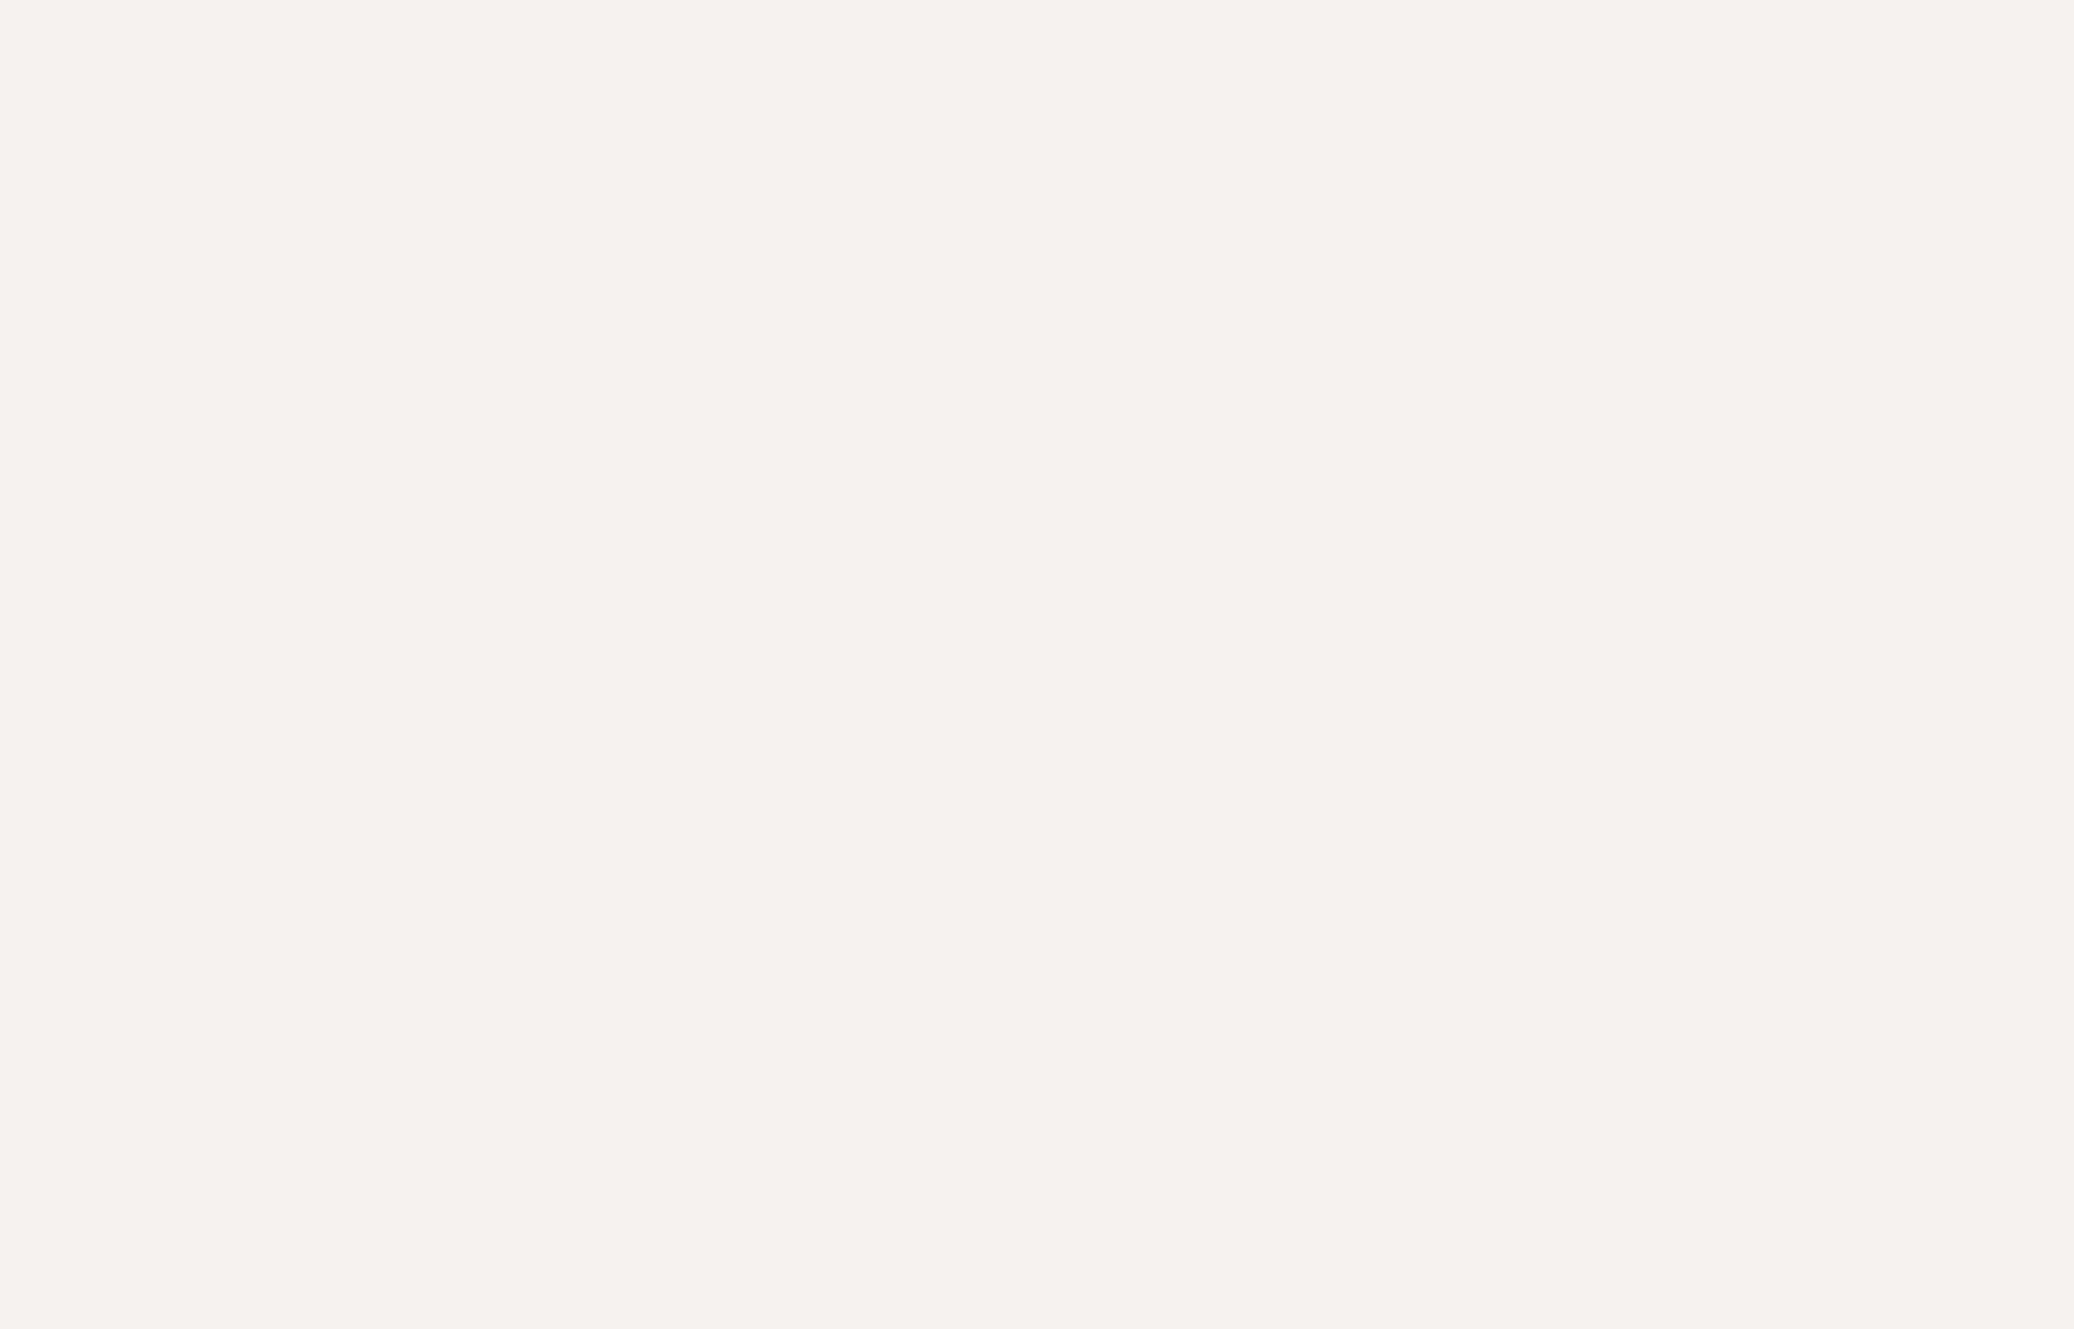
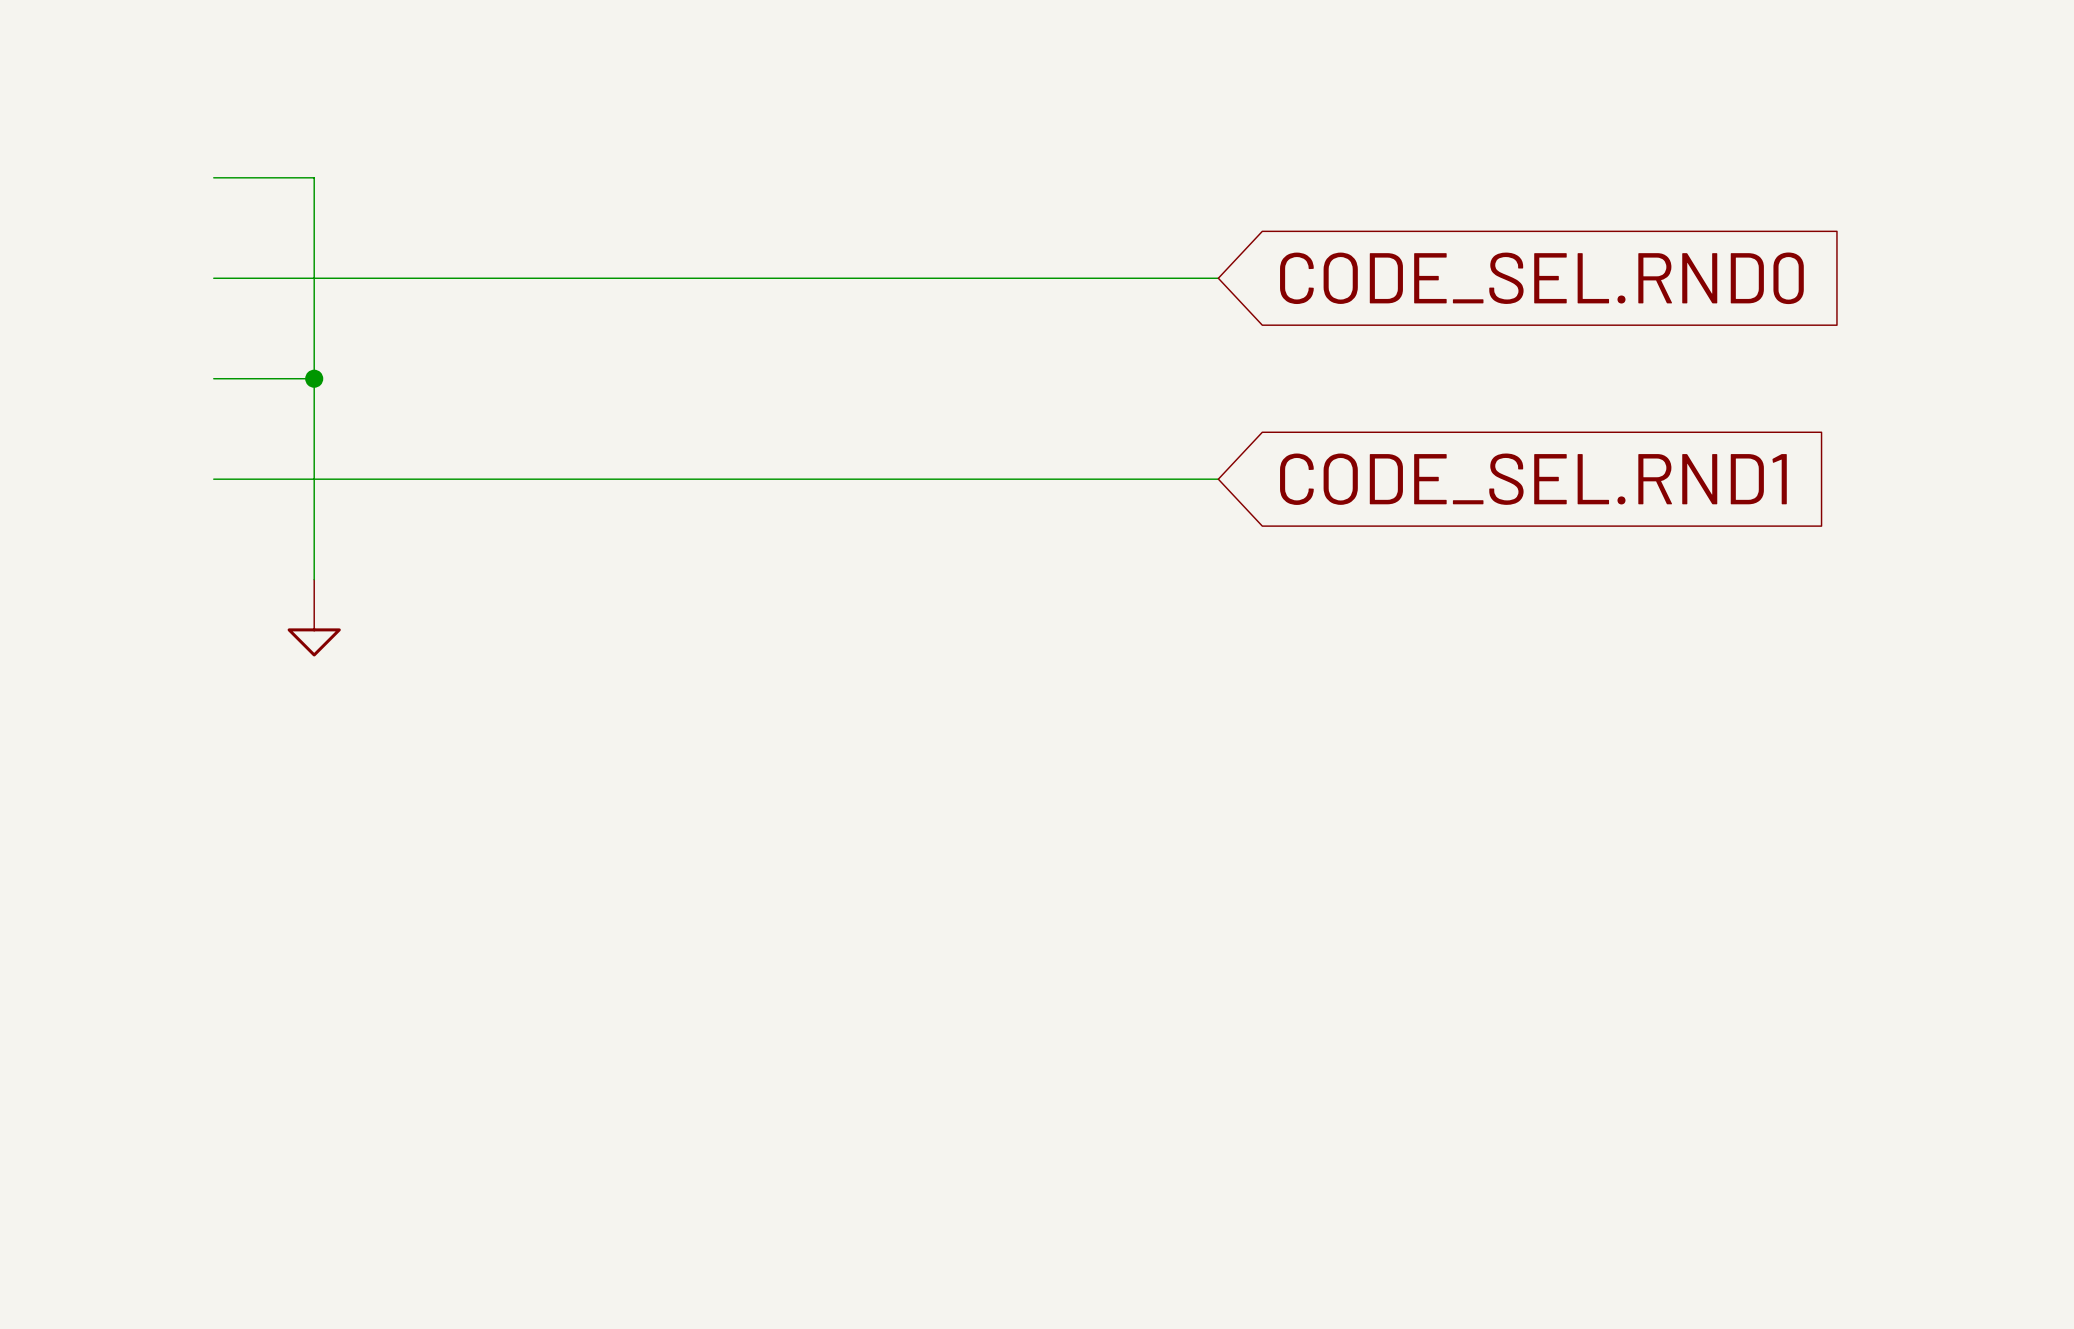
wire: none -> (213, 177) (314, 177) (314, 579)
wire: none -> (213, 278) (1218, 278)
global label: none -> CODE_SEL.RND0 (1541, 278)
wire: none -> (213, 378) (314, 378)
junction: none -> (314, 378)
wire: none -> (213, 479) (1218, 479)
global label: none -> CODE_SEL.RND1 (1533, 479)
power symbol: none -> (314, 618)

